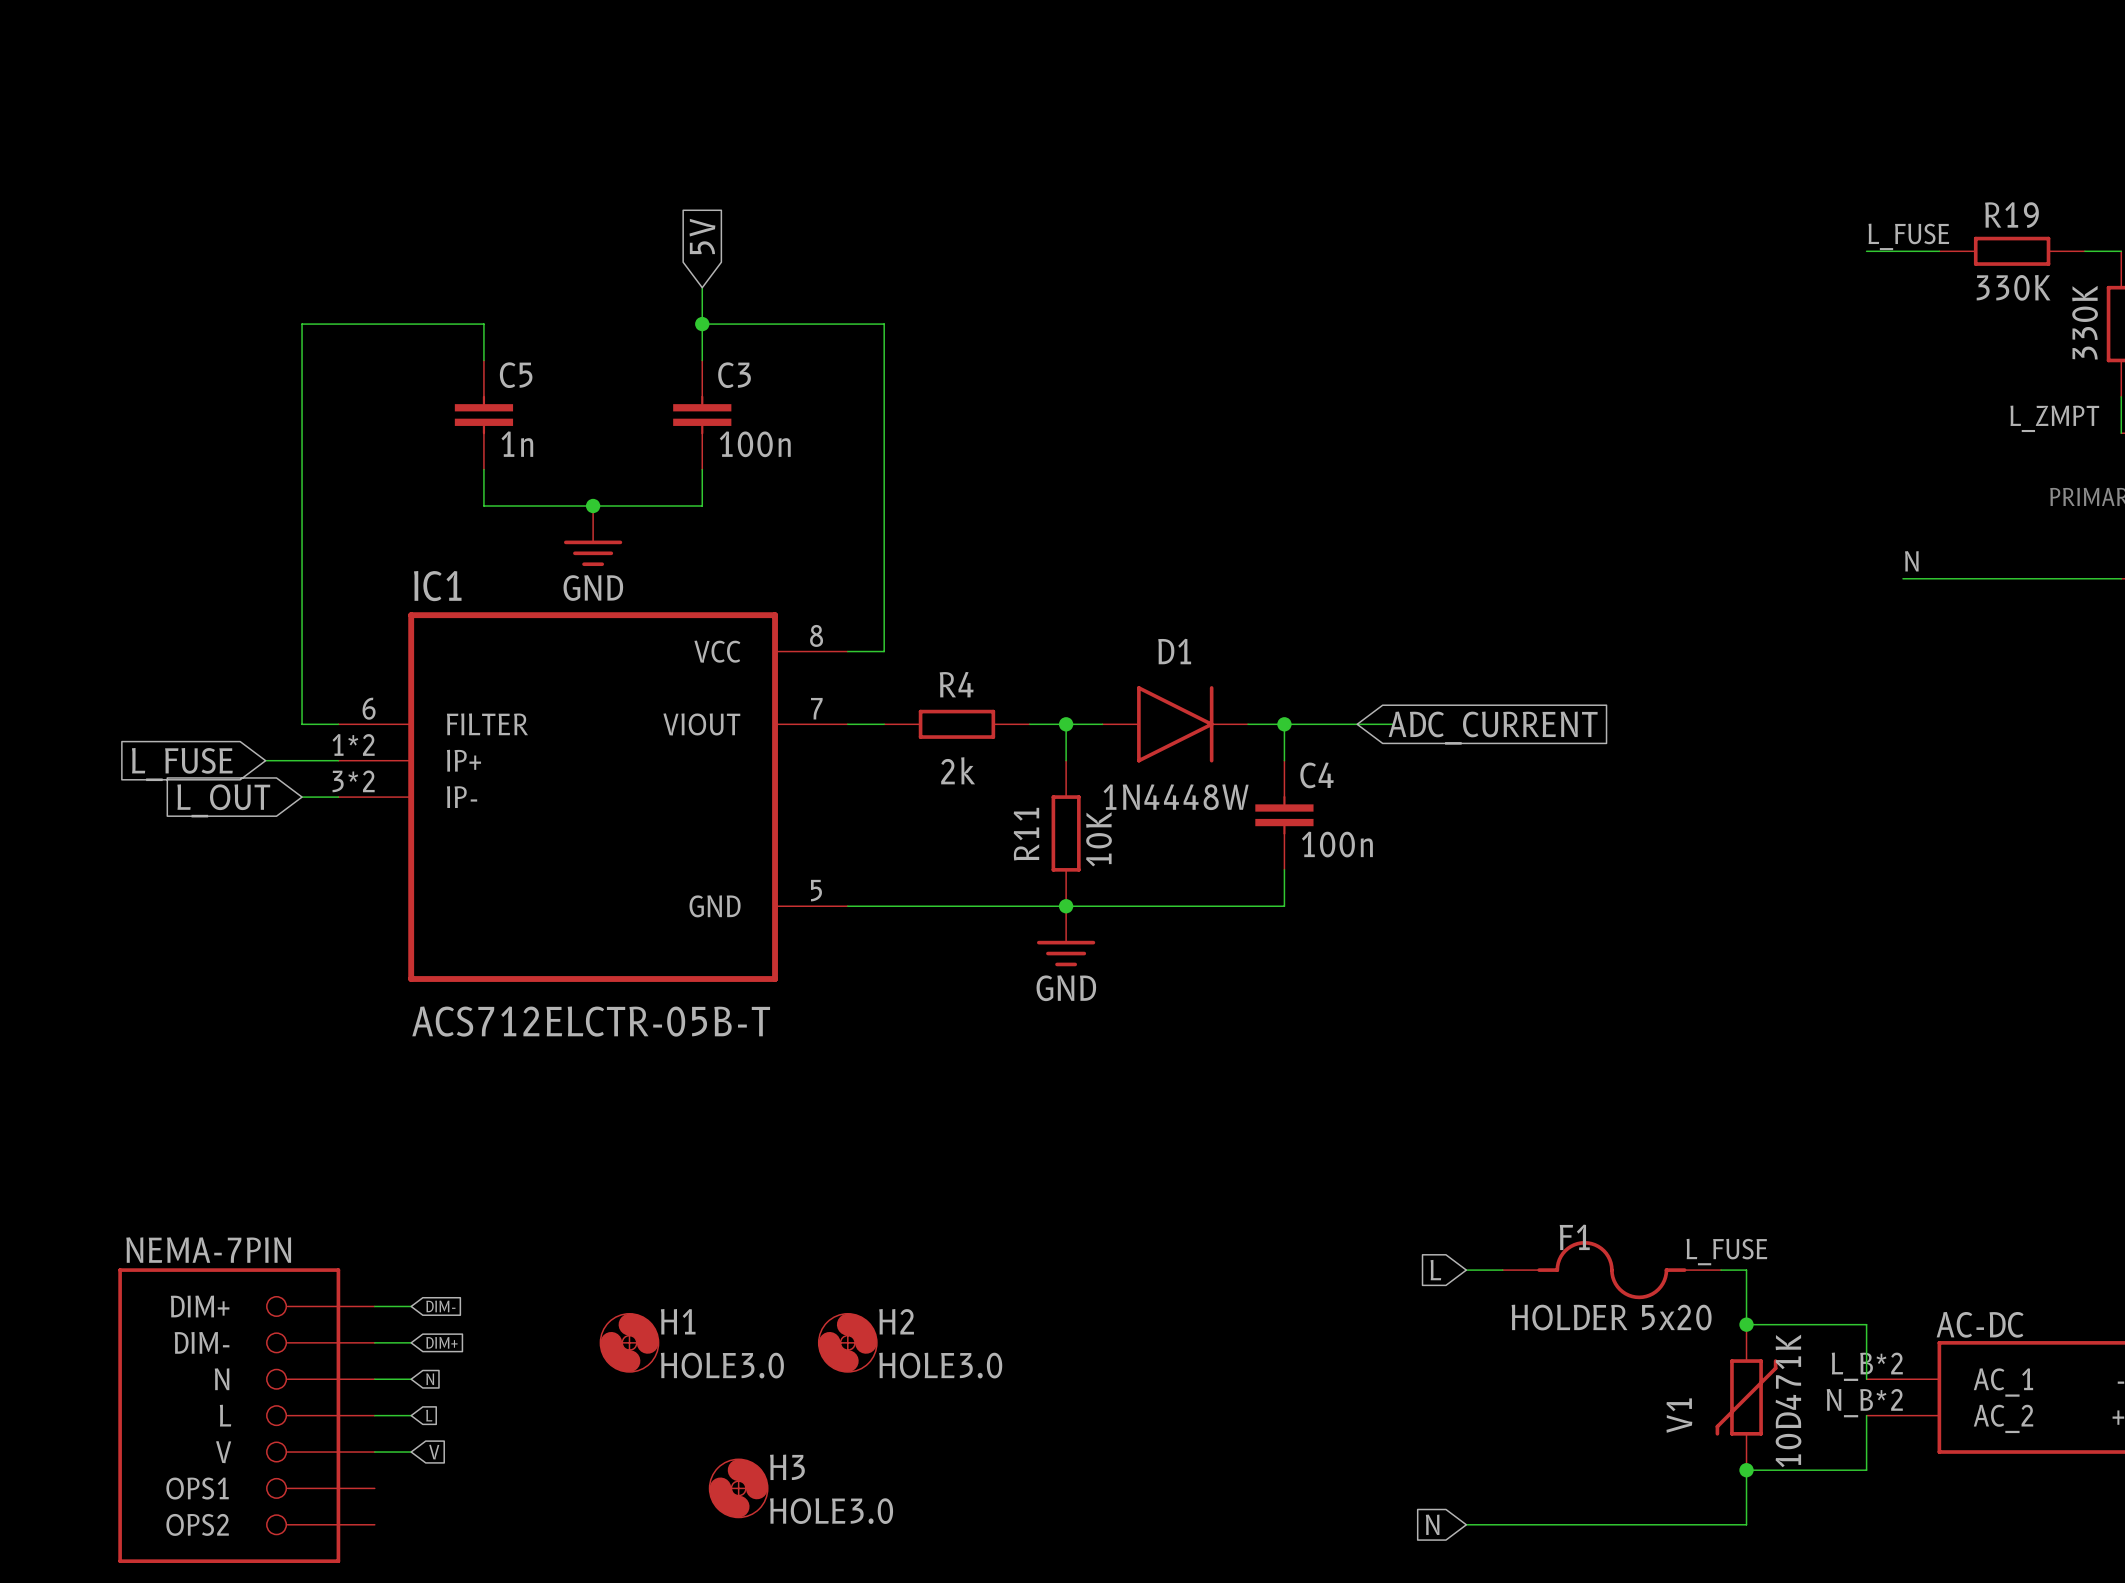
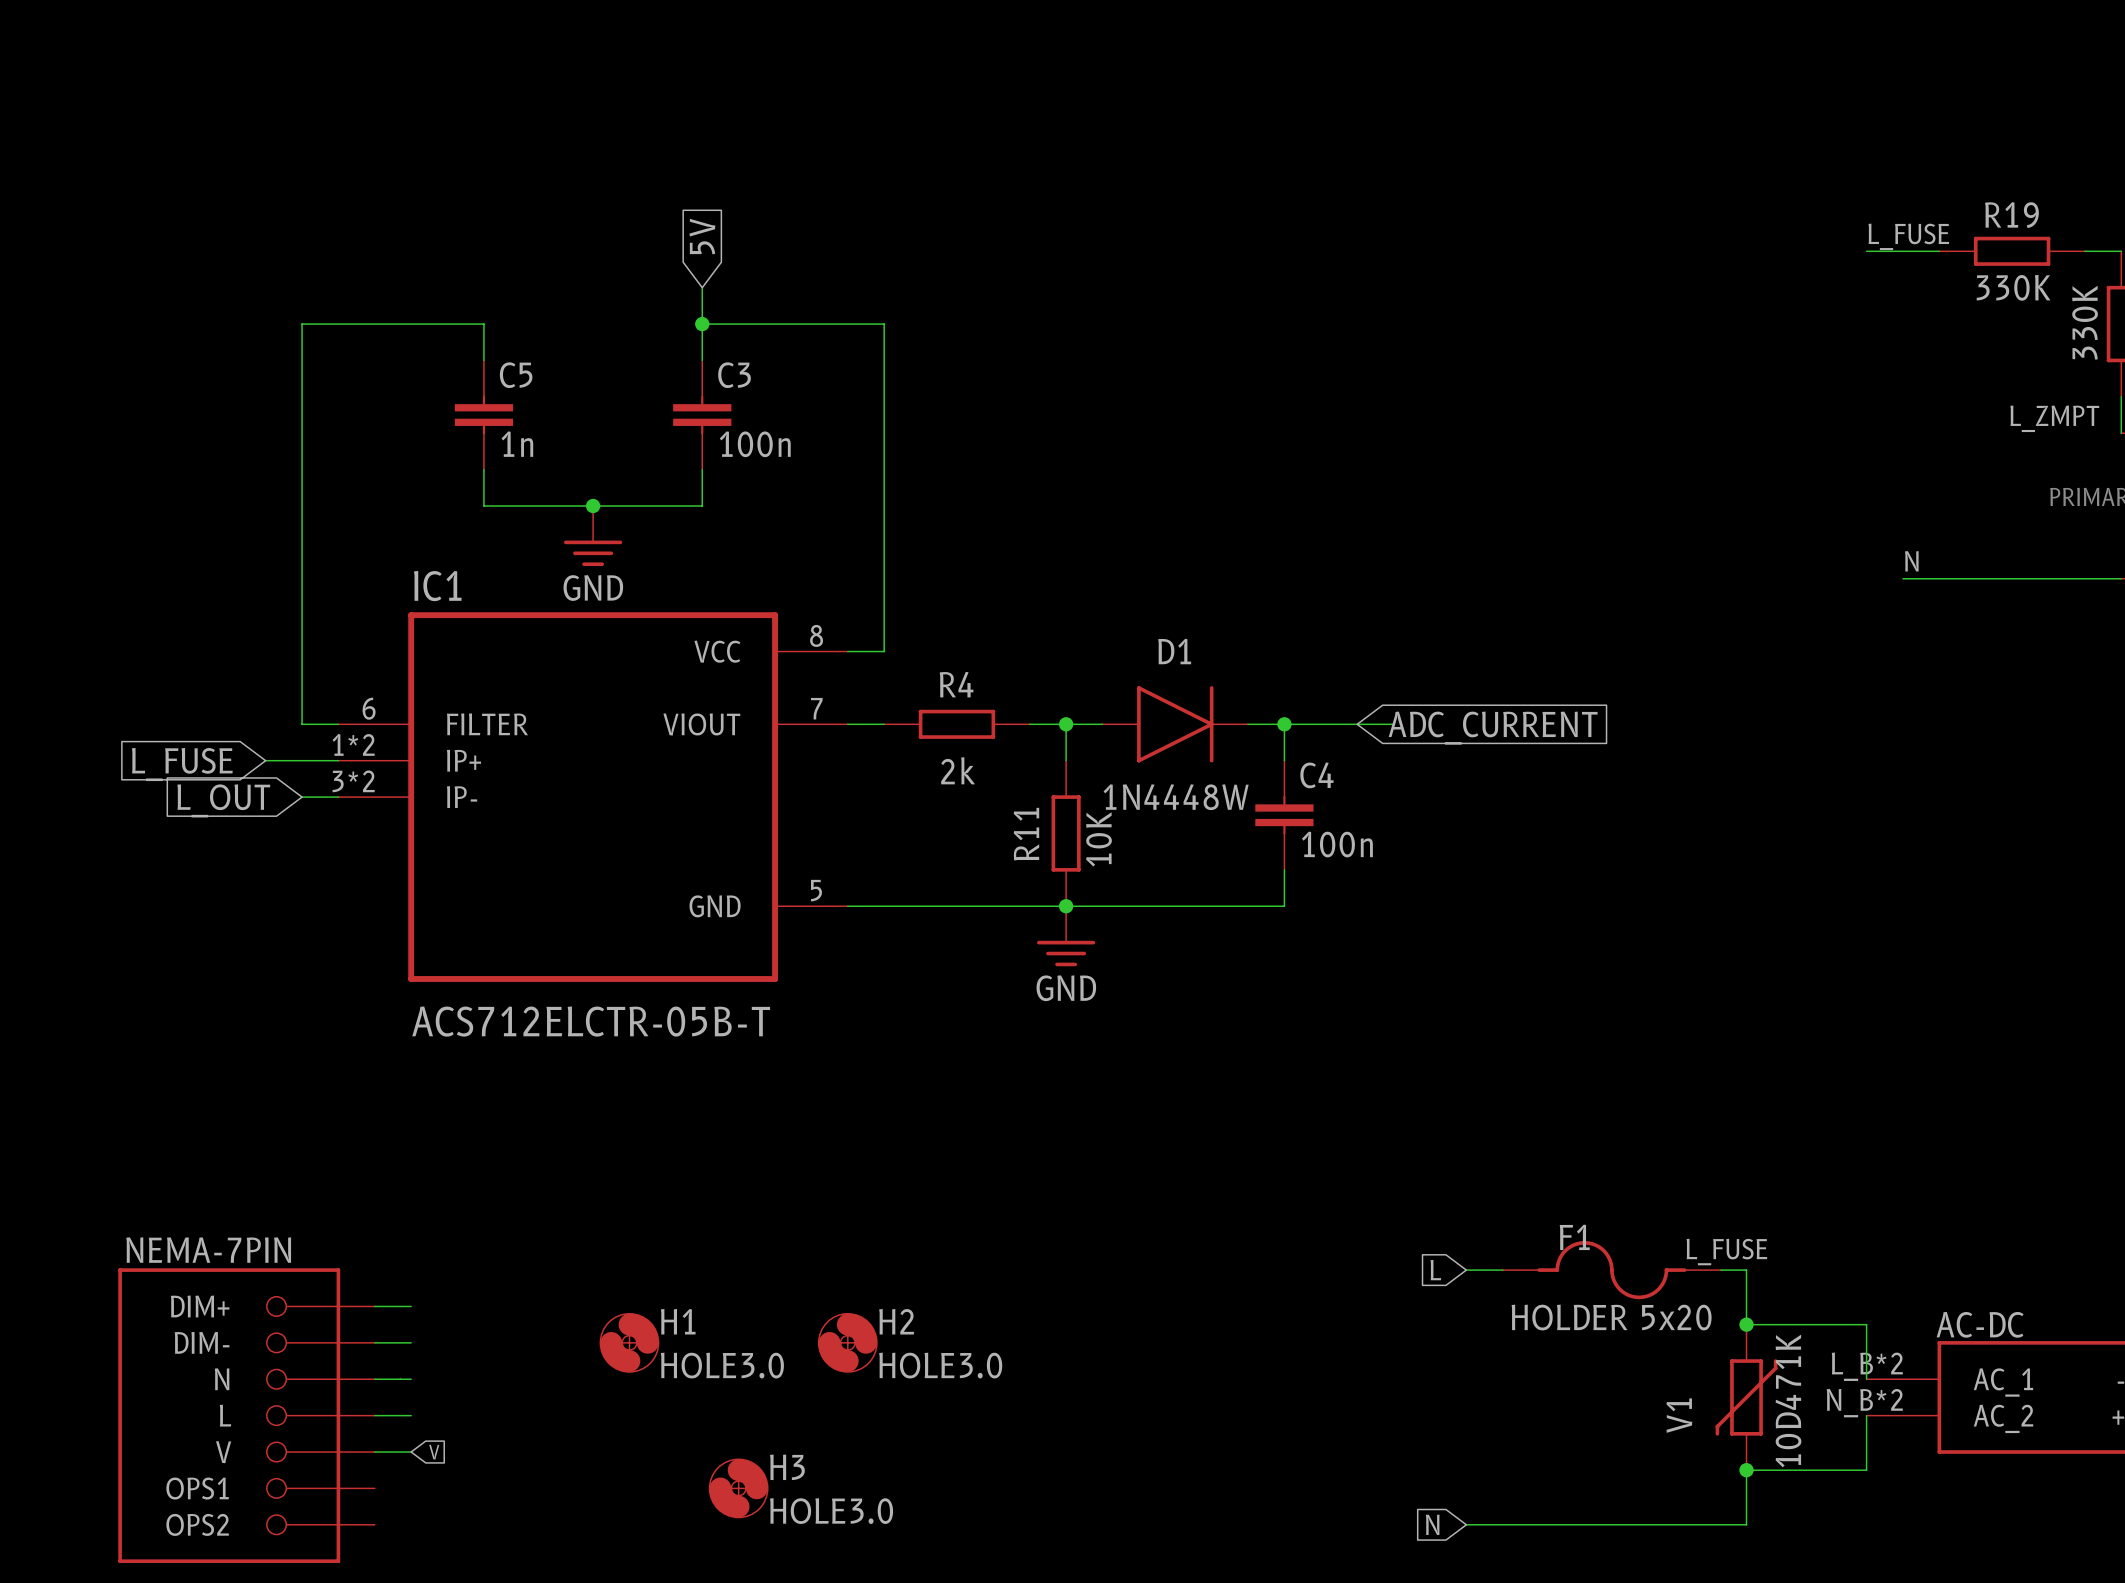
global label: DIM- (440, 1306) -> none
global label: DIM+ (441, 1342) -> none
global label: N (430, 1379) -> none
global label: L (429, 1415) -> none

